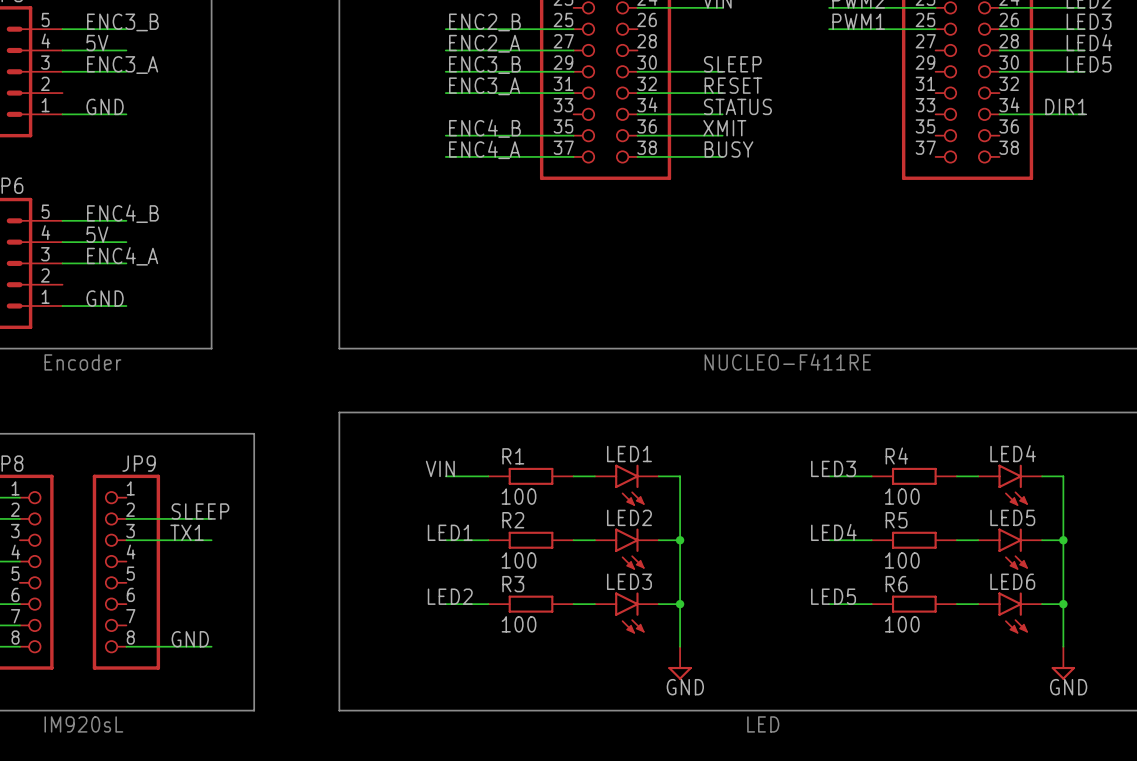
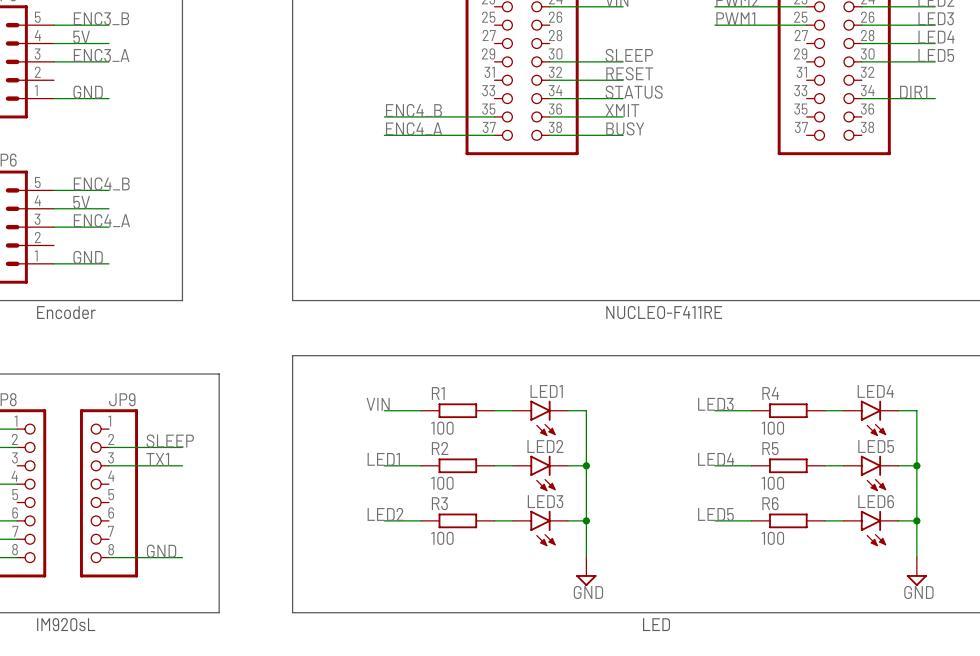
label: ENC2_B (484, 22) -> none
wire: (445, 29) (573, 29) -> none
label: ENC2_A (484, 43) -> none
wire: (445, 50) (573, 50) -> none
label: ENC3_B (484, 65) -> none
wire: (445, 71) (573, 71) -> none
label: ENC3_A (484, 86) -> none
wire: (445, 93) (573, 93) -> none

